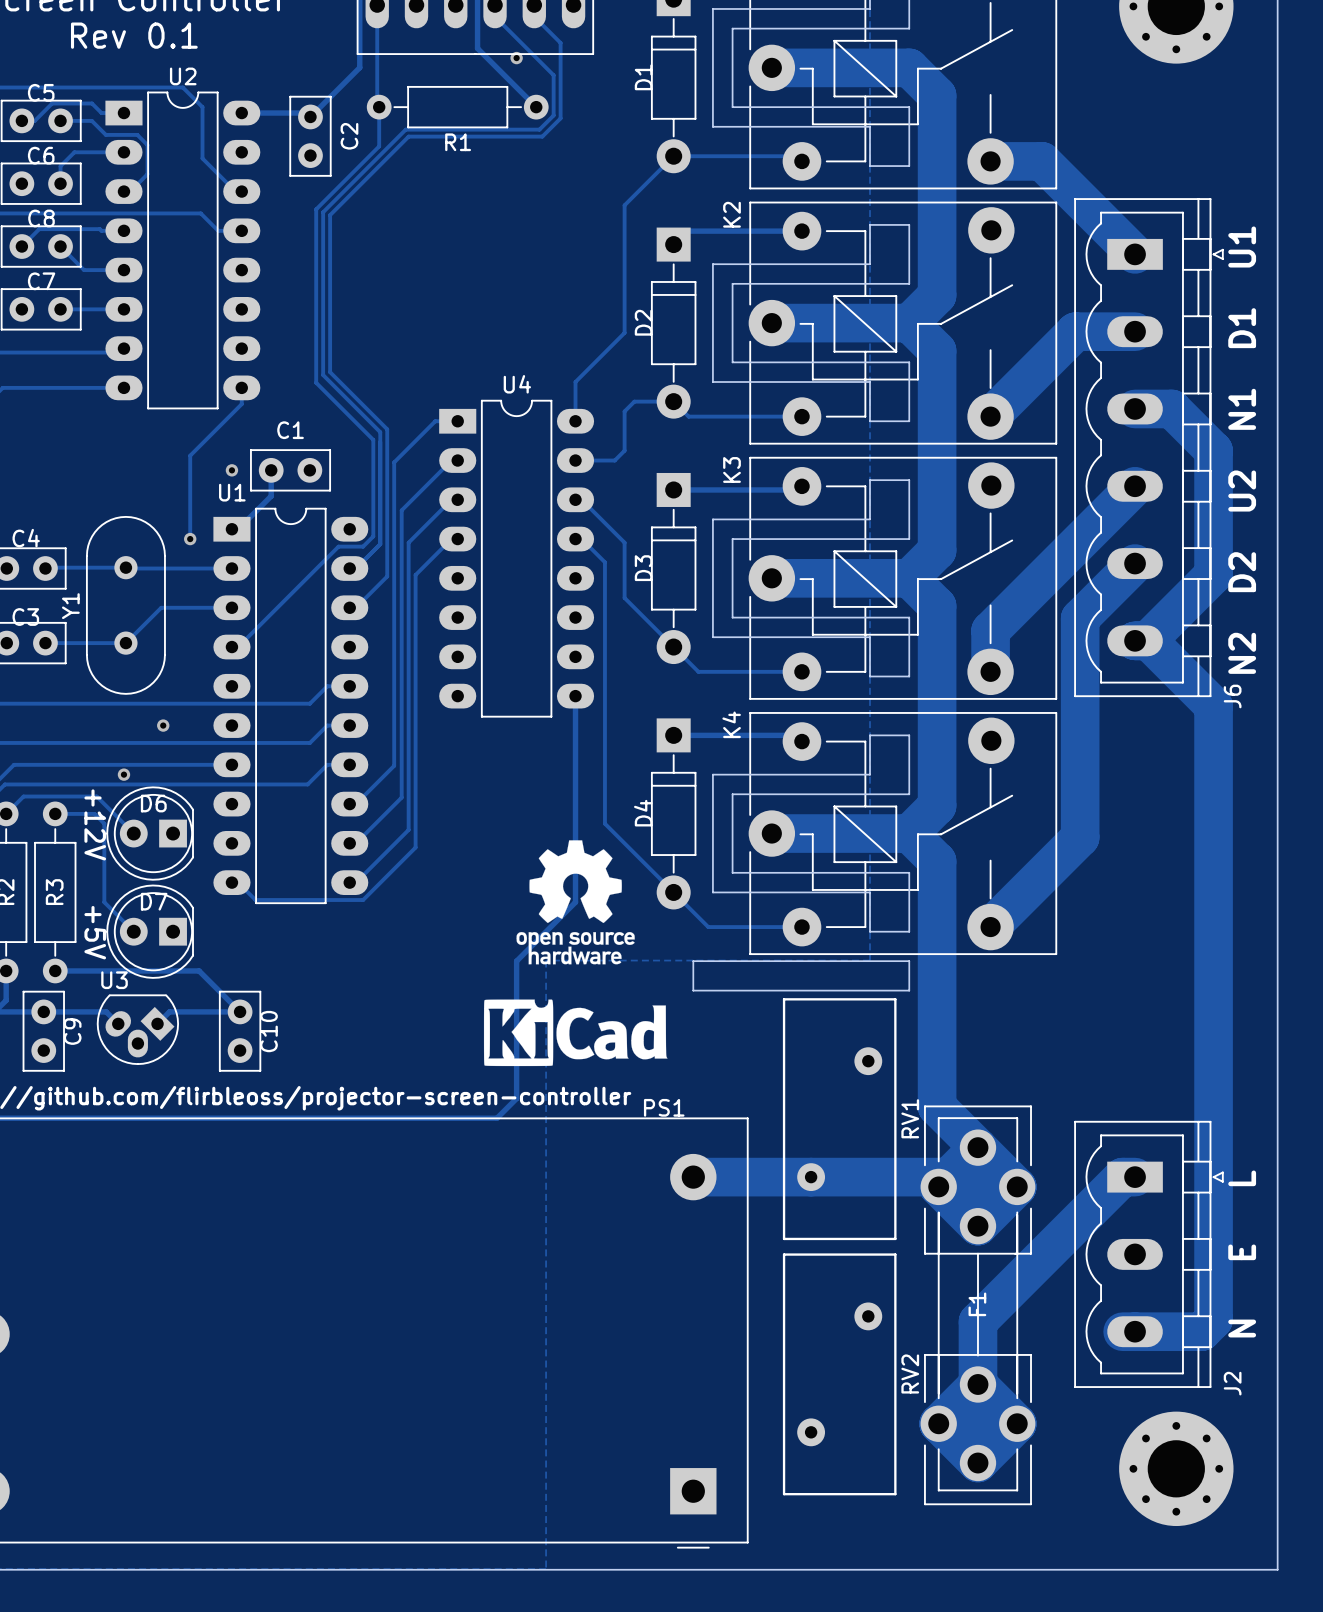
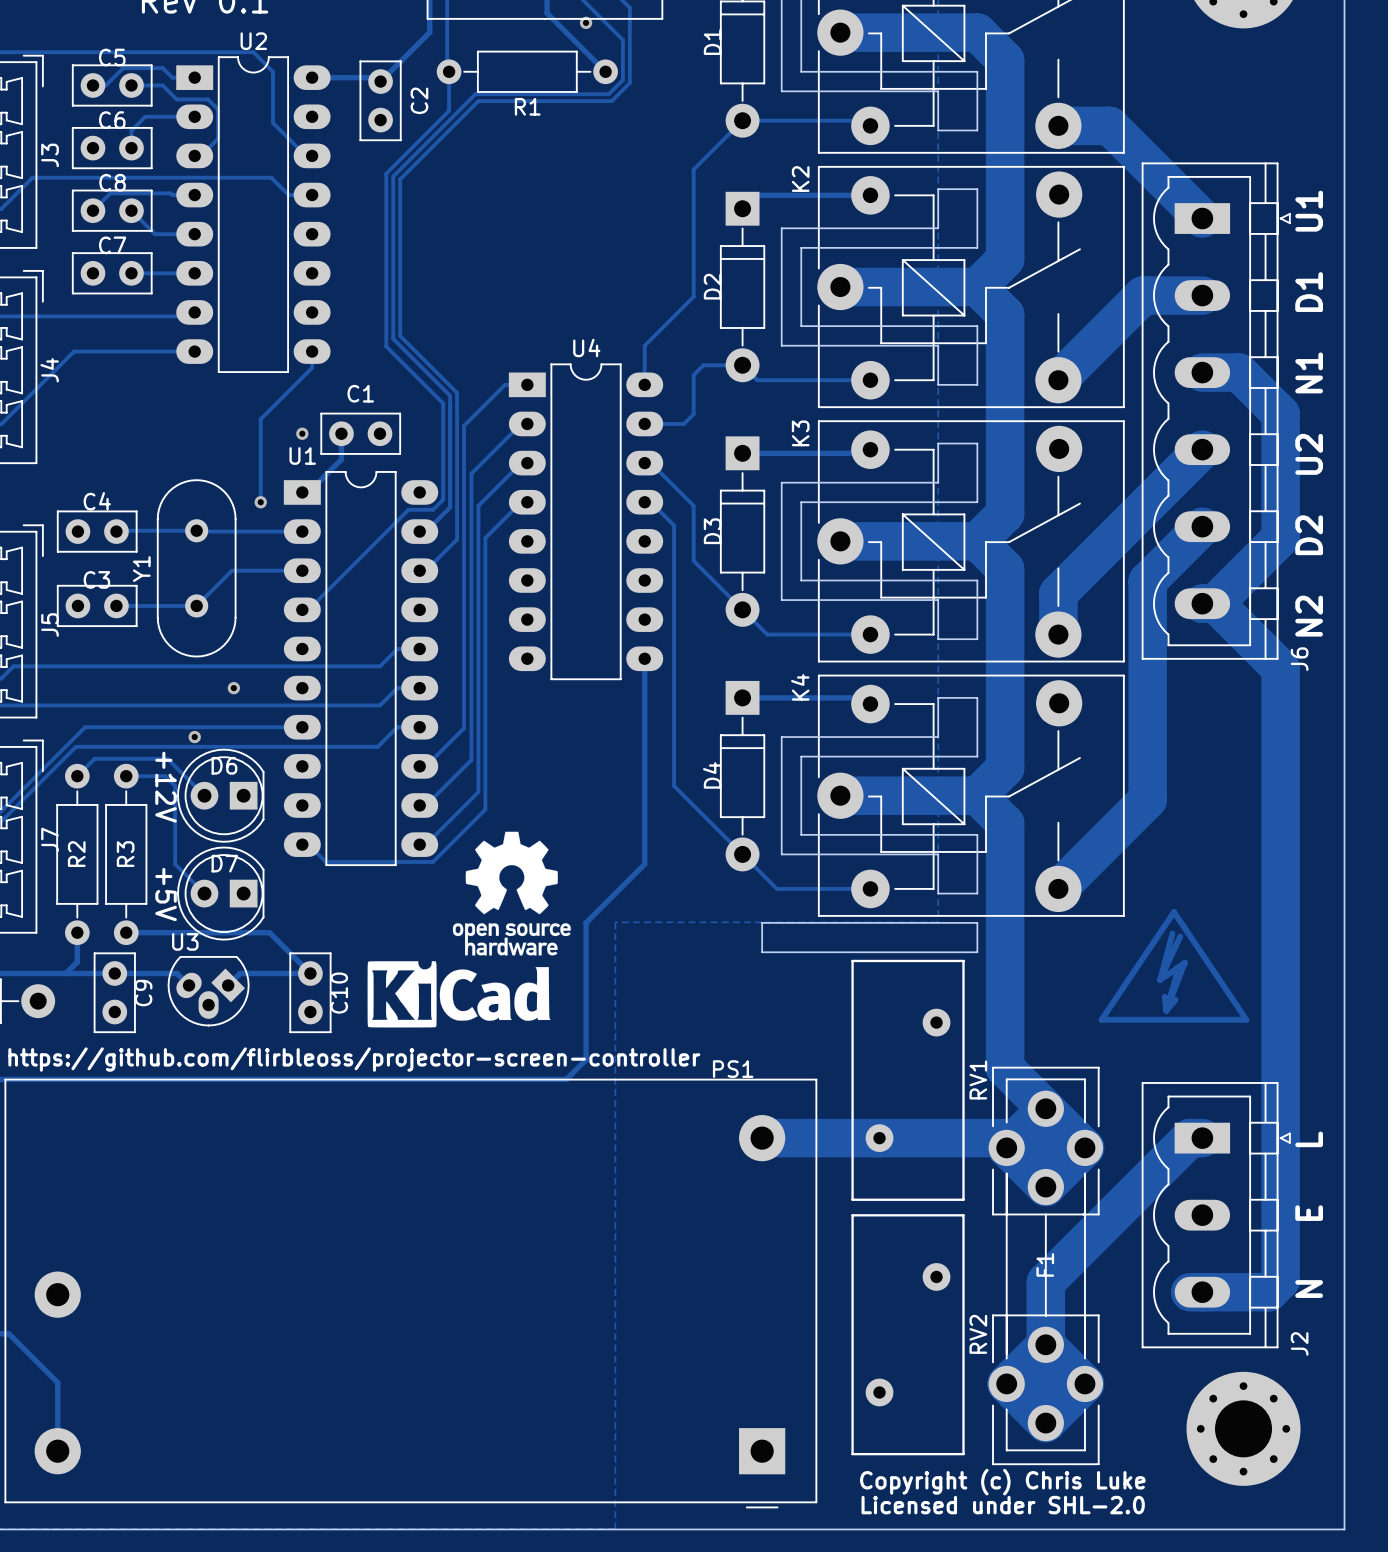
drawing position: (575, 902) -> (511, 893)
drawing: none -> [1098, 909, 1250, 1023]
drawing position: (575, 1032) -> (459, 994)
text: none -> Copyright (c) Chris Luke (1002, 1482)
text: none -> Licensed under SHL-2.0 (1003, 1505)

